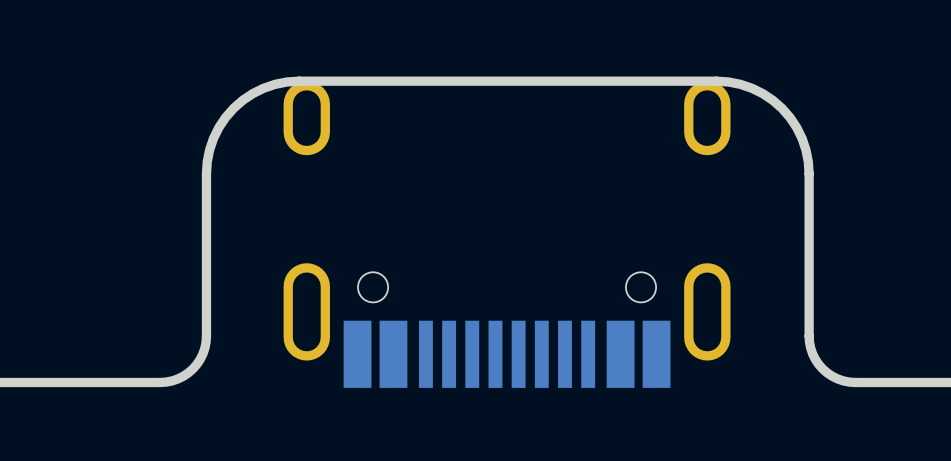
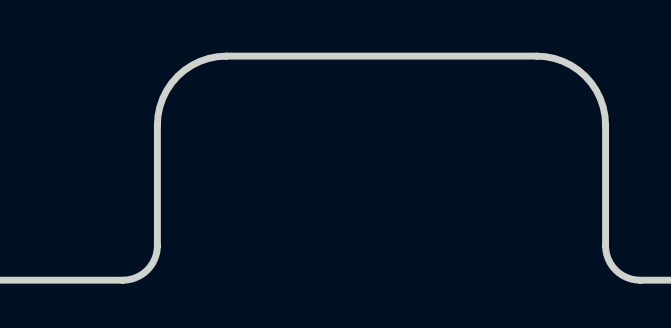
part: (507, 234) -> none

